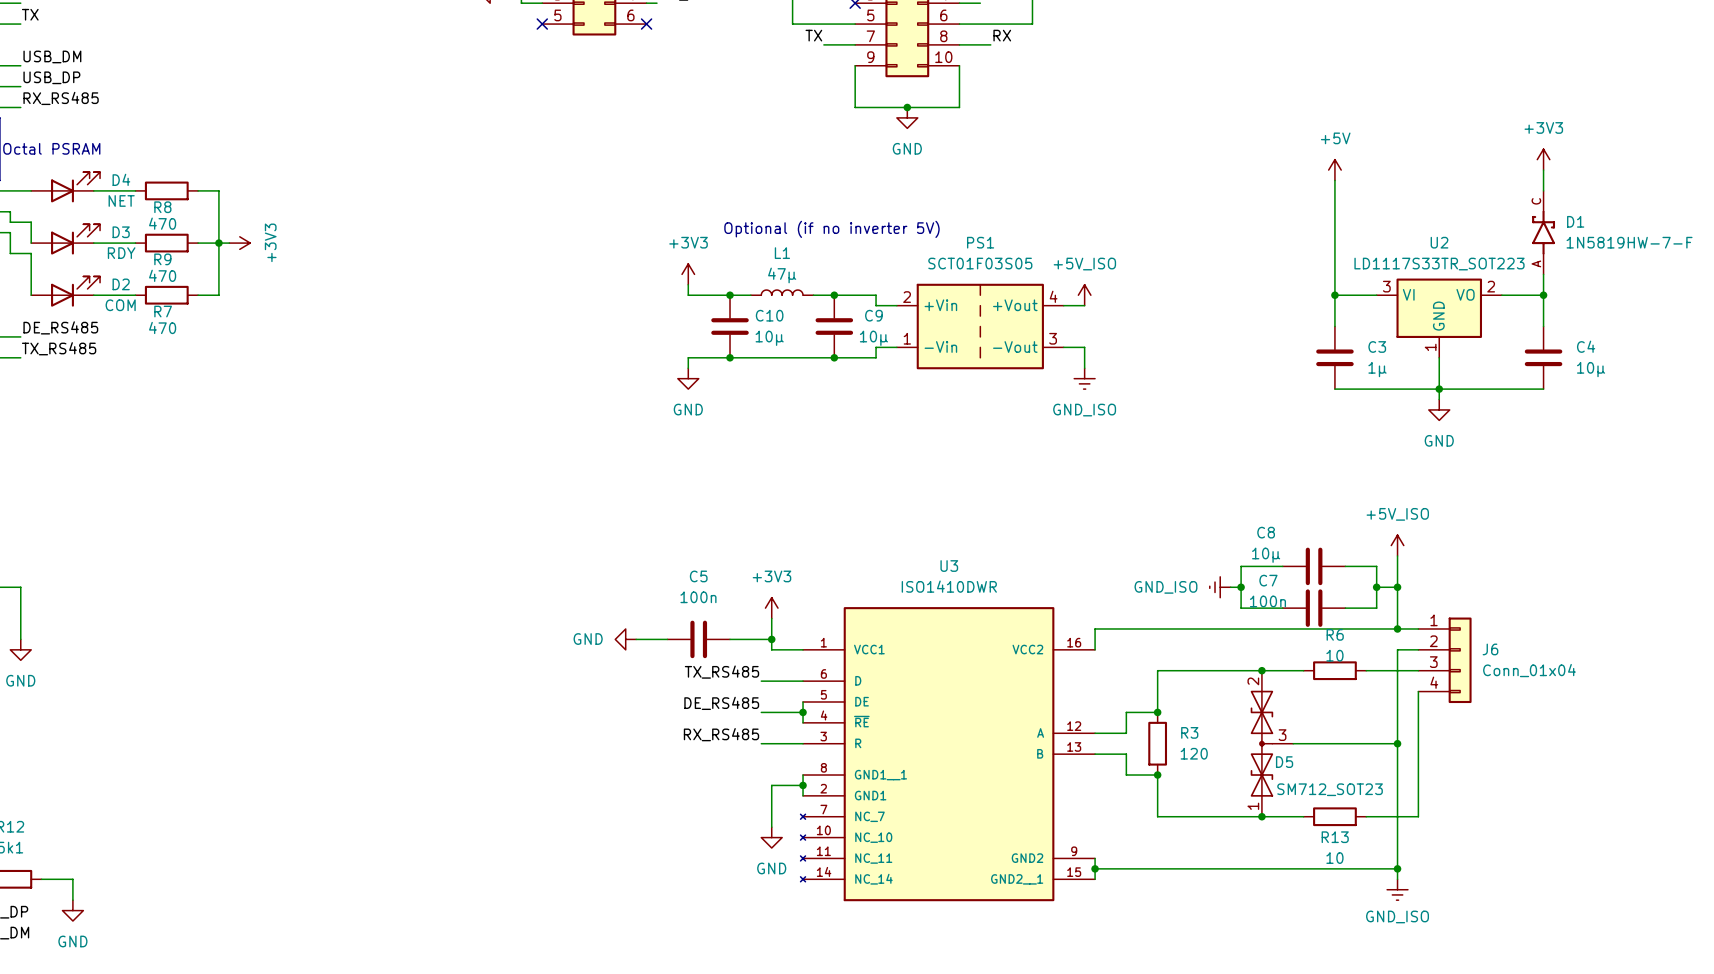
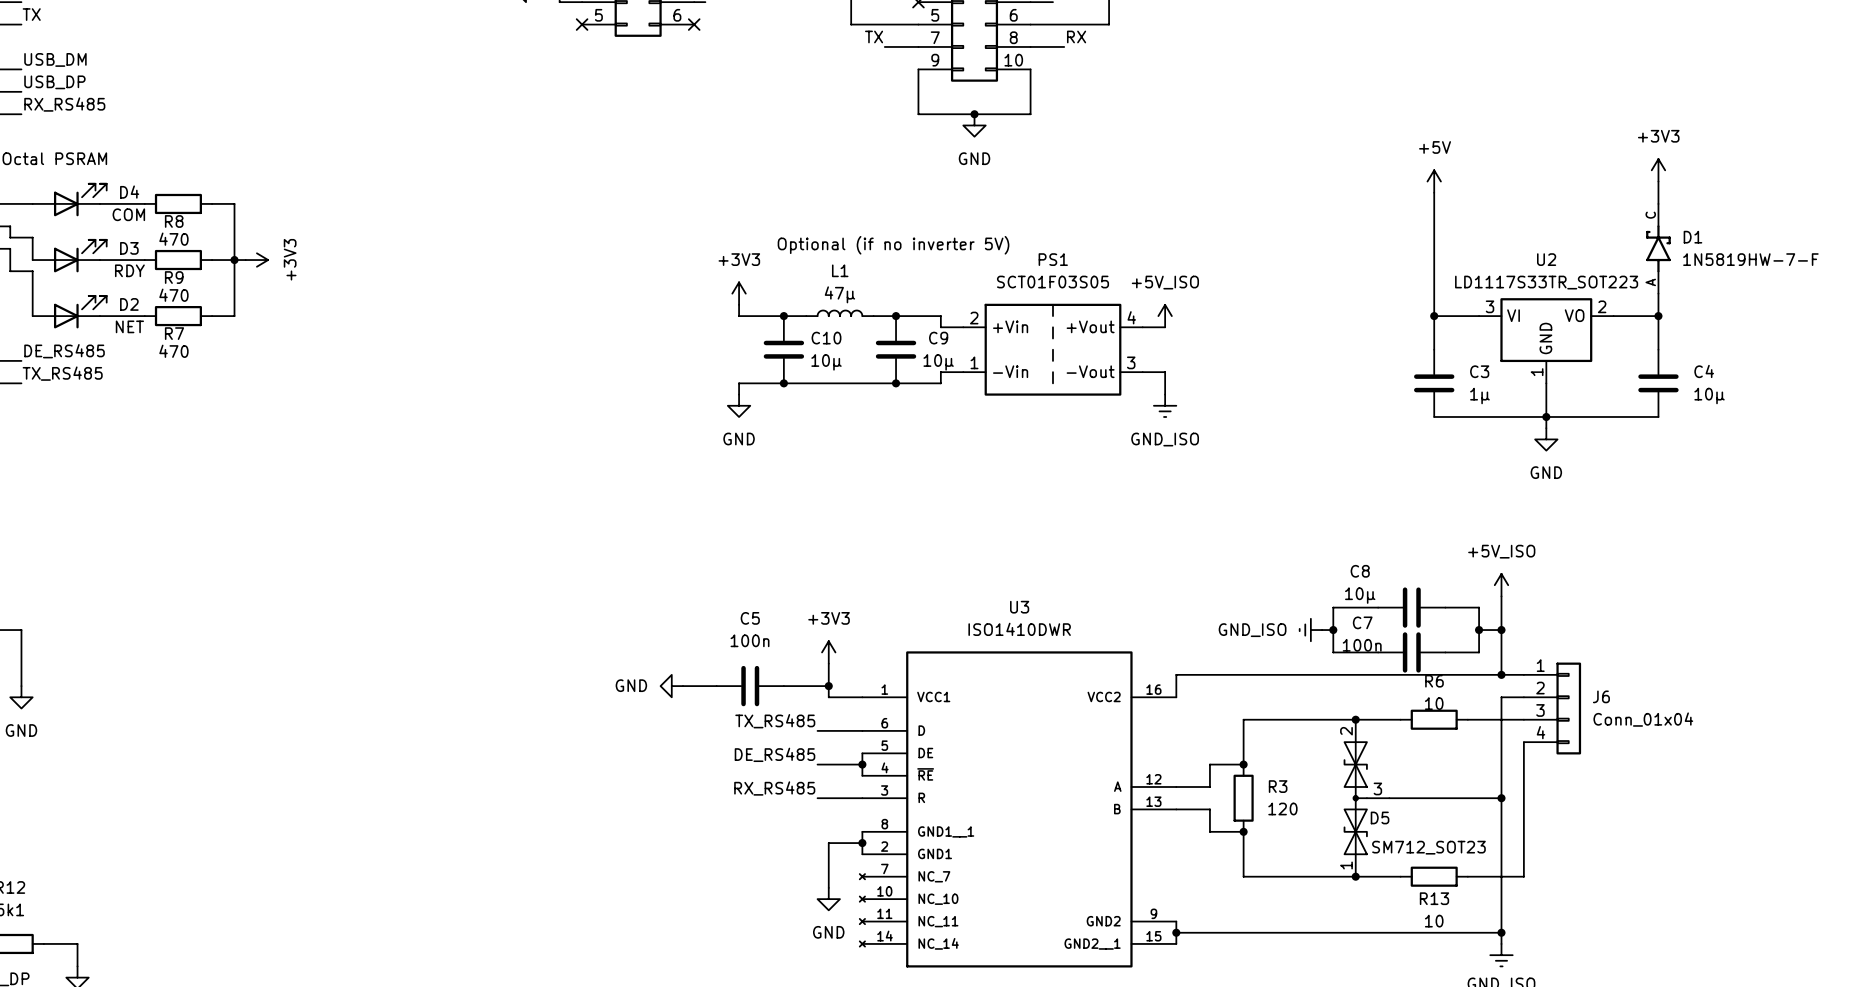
D4 value: NET (121, 200) -> COM (128, 214)
D2 value: COM (120, 305) -> NET (129, 326)

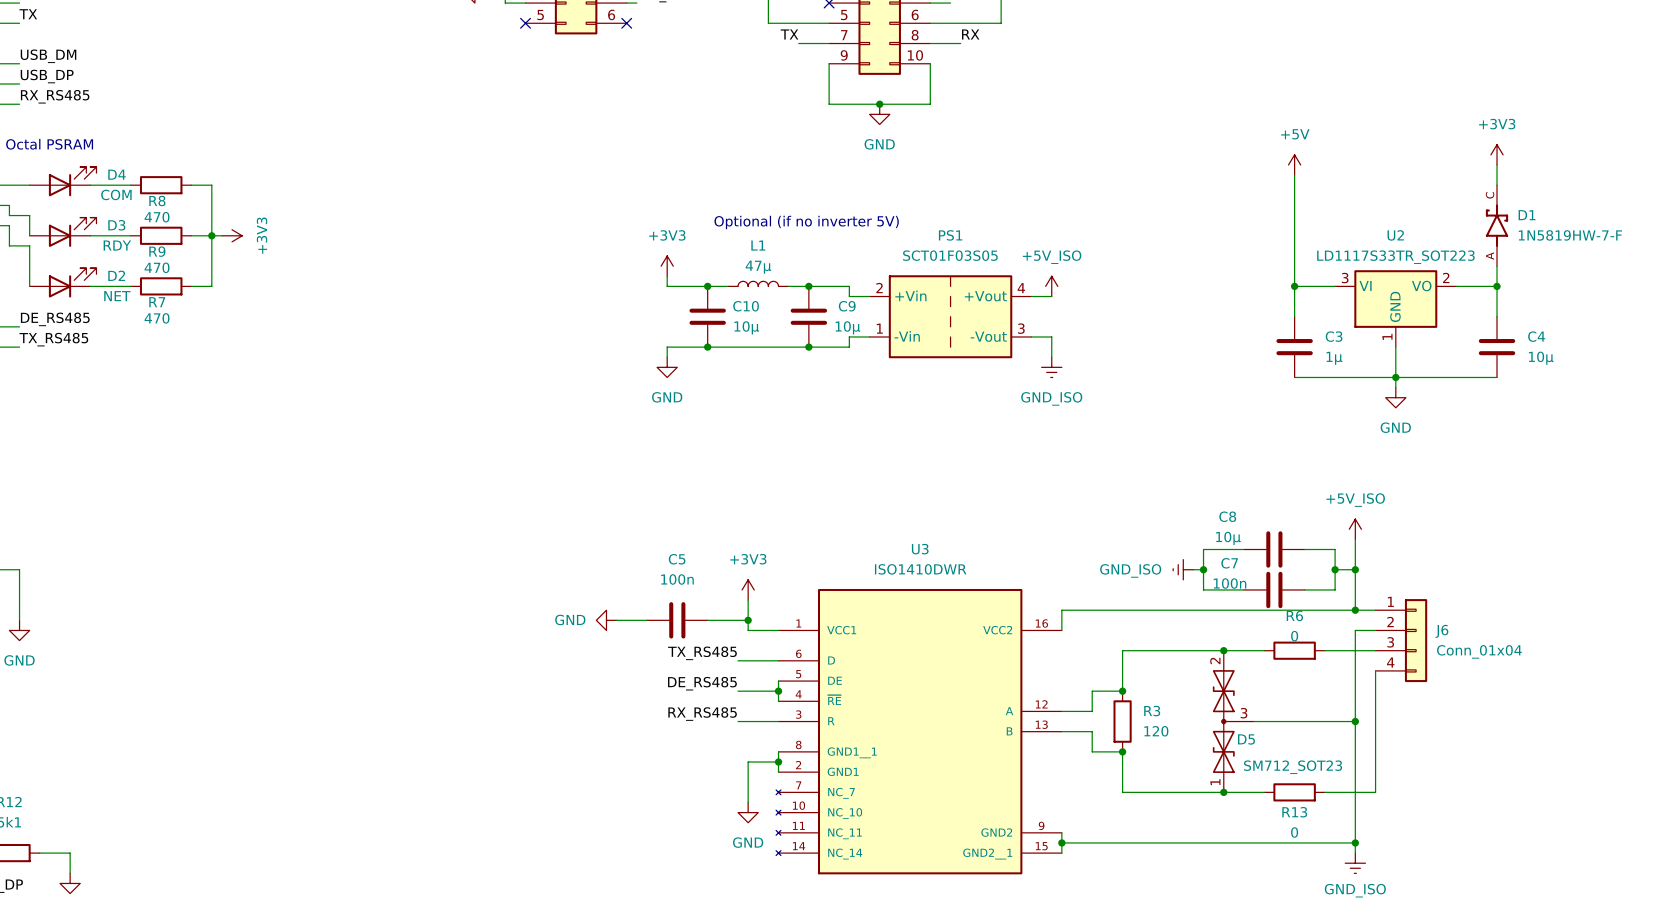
R6 value: 10 (1434, 703) -> 0 (1294, 636)
R13 value: 10 (1434, 921) -> 0 (1294, 832)

